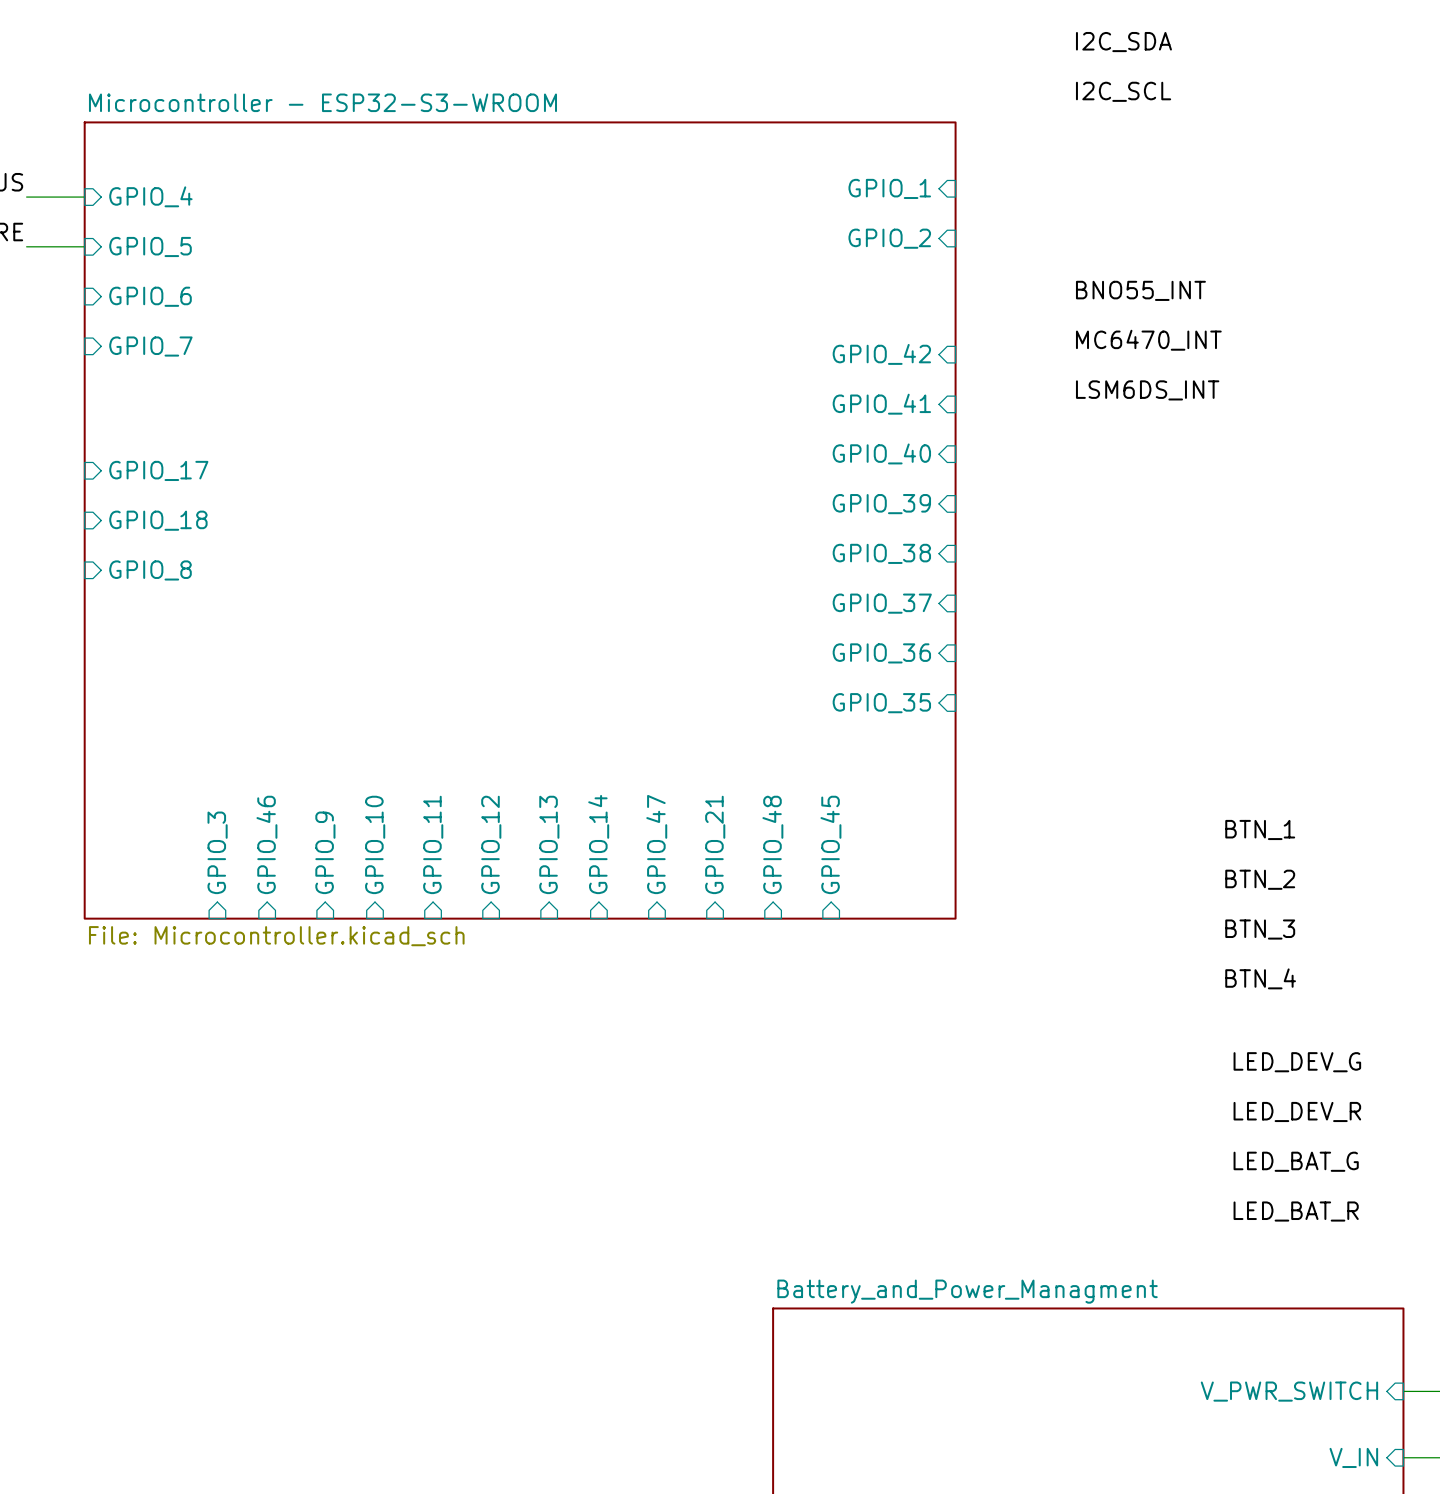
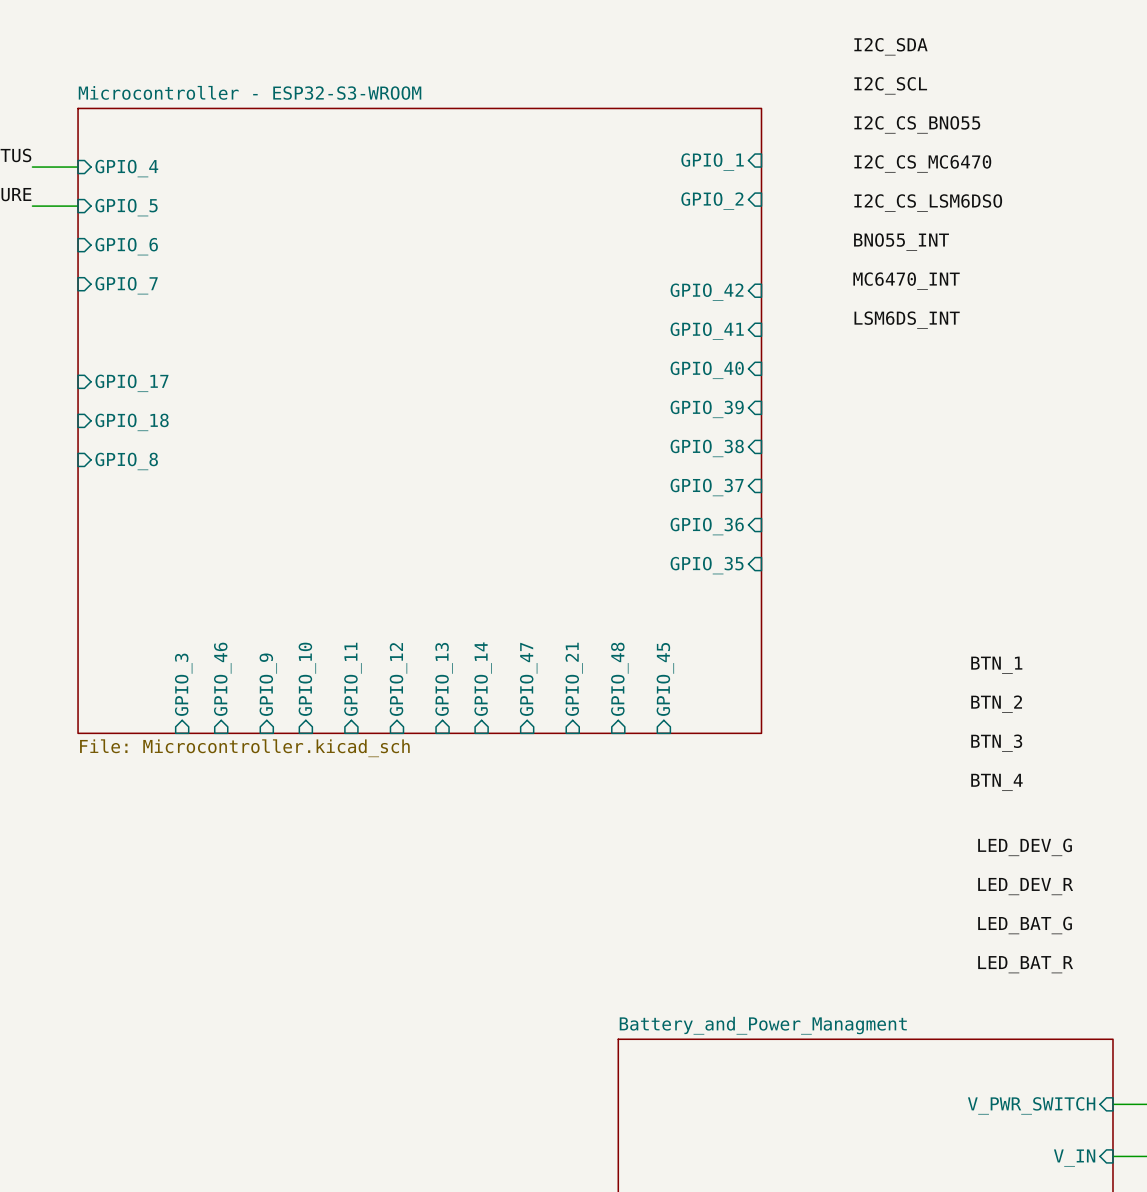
label: none -> I2C_CS_BNO55 (917, 124)
label: none -> I2C_CS_MC6470 (922, 163)
label: none -> I2C_CS_LSM6DSO (928, 202)

